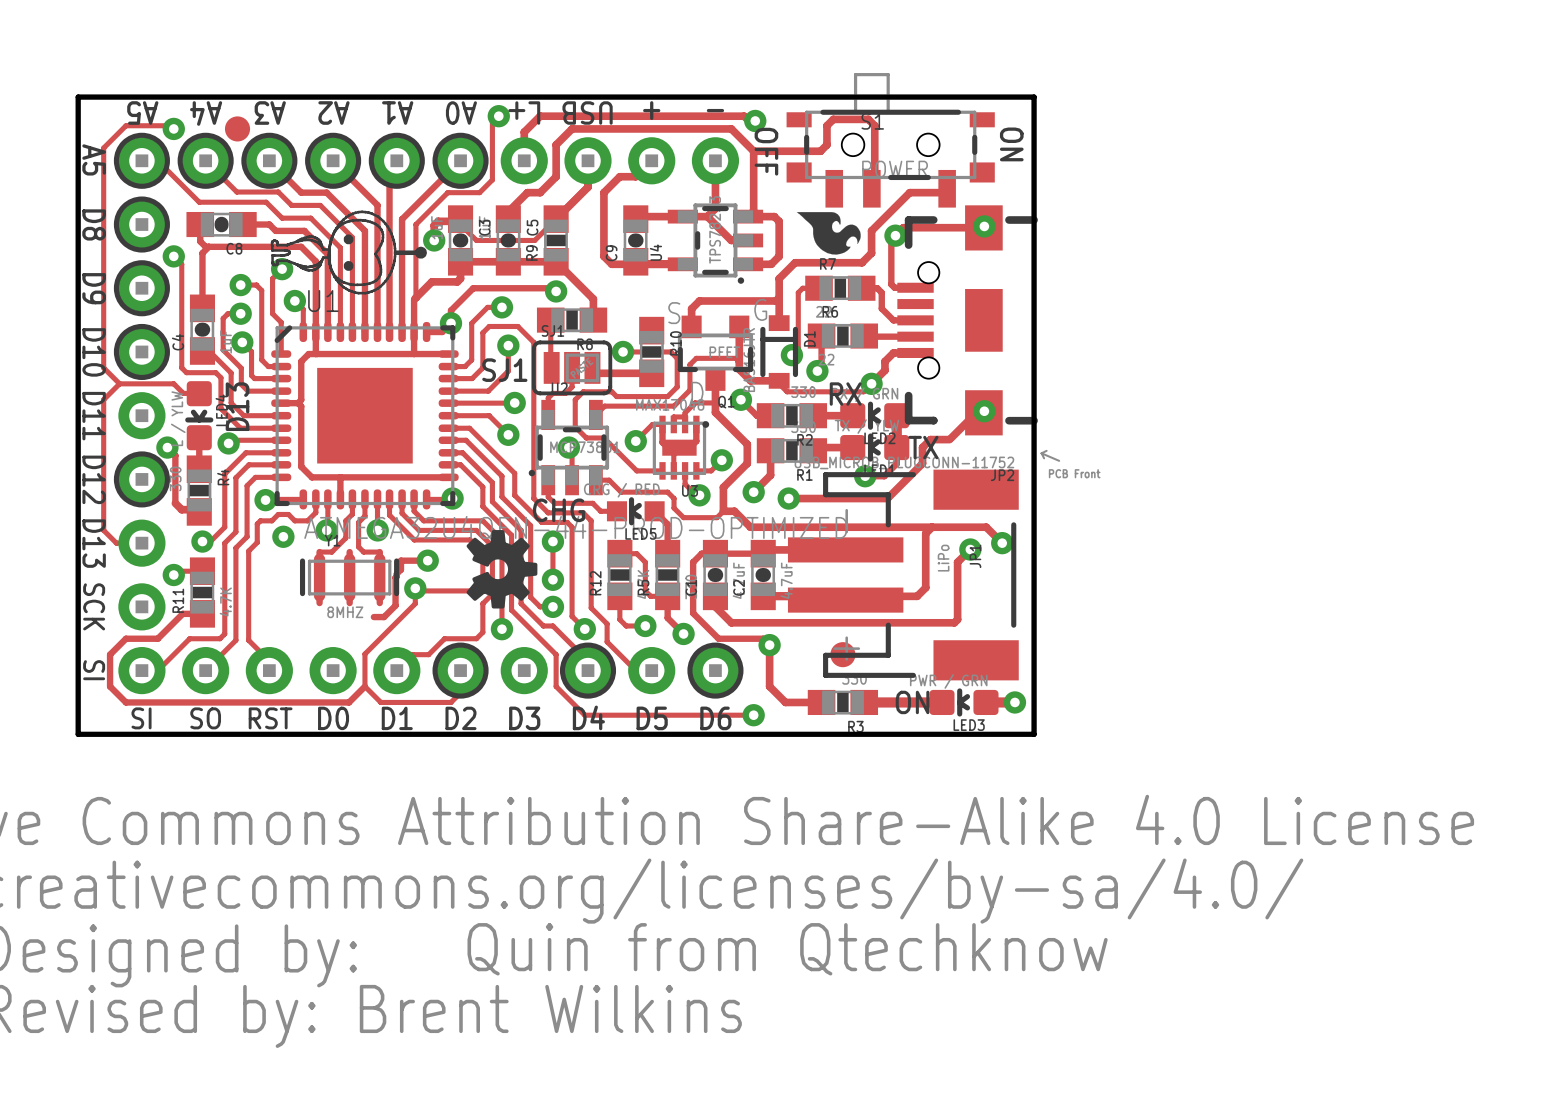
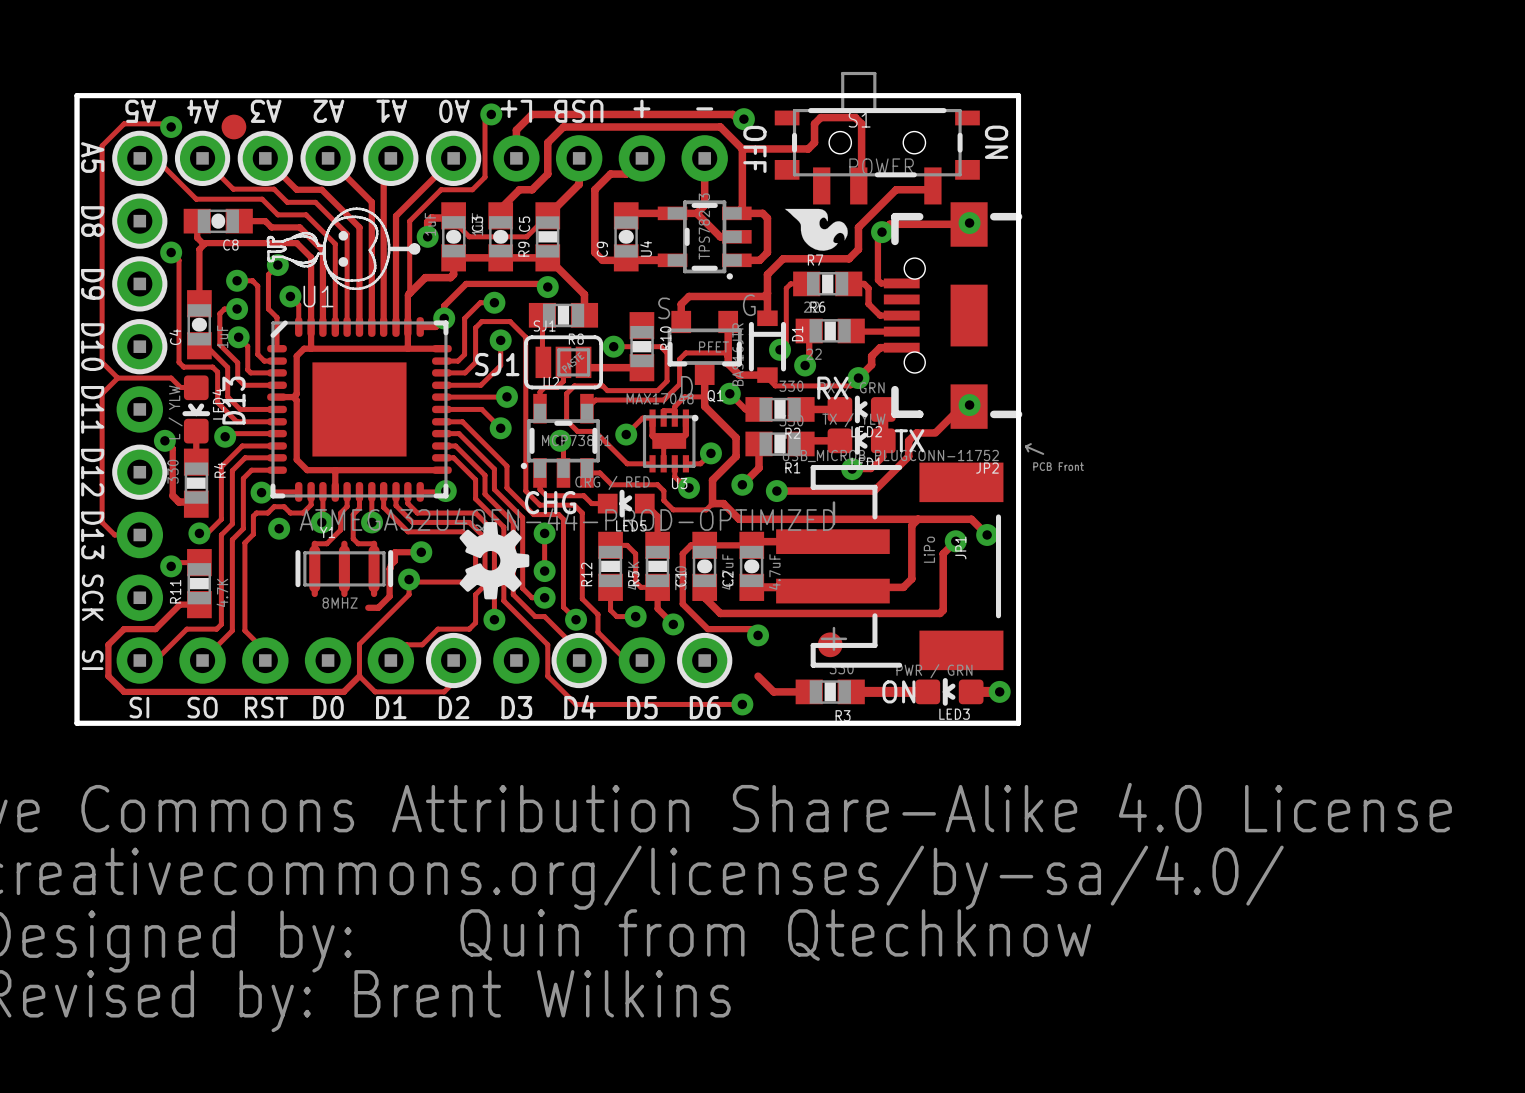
track: (769, 645) (769, 686) -> none

